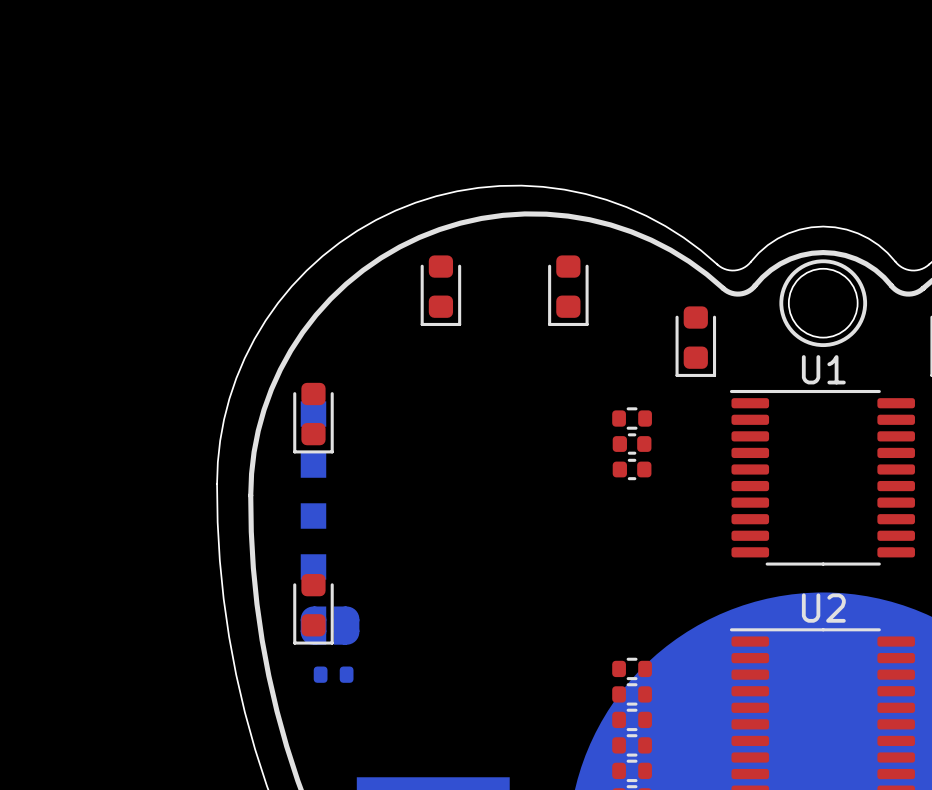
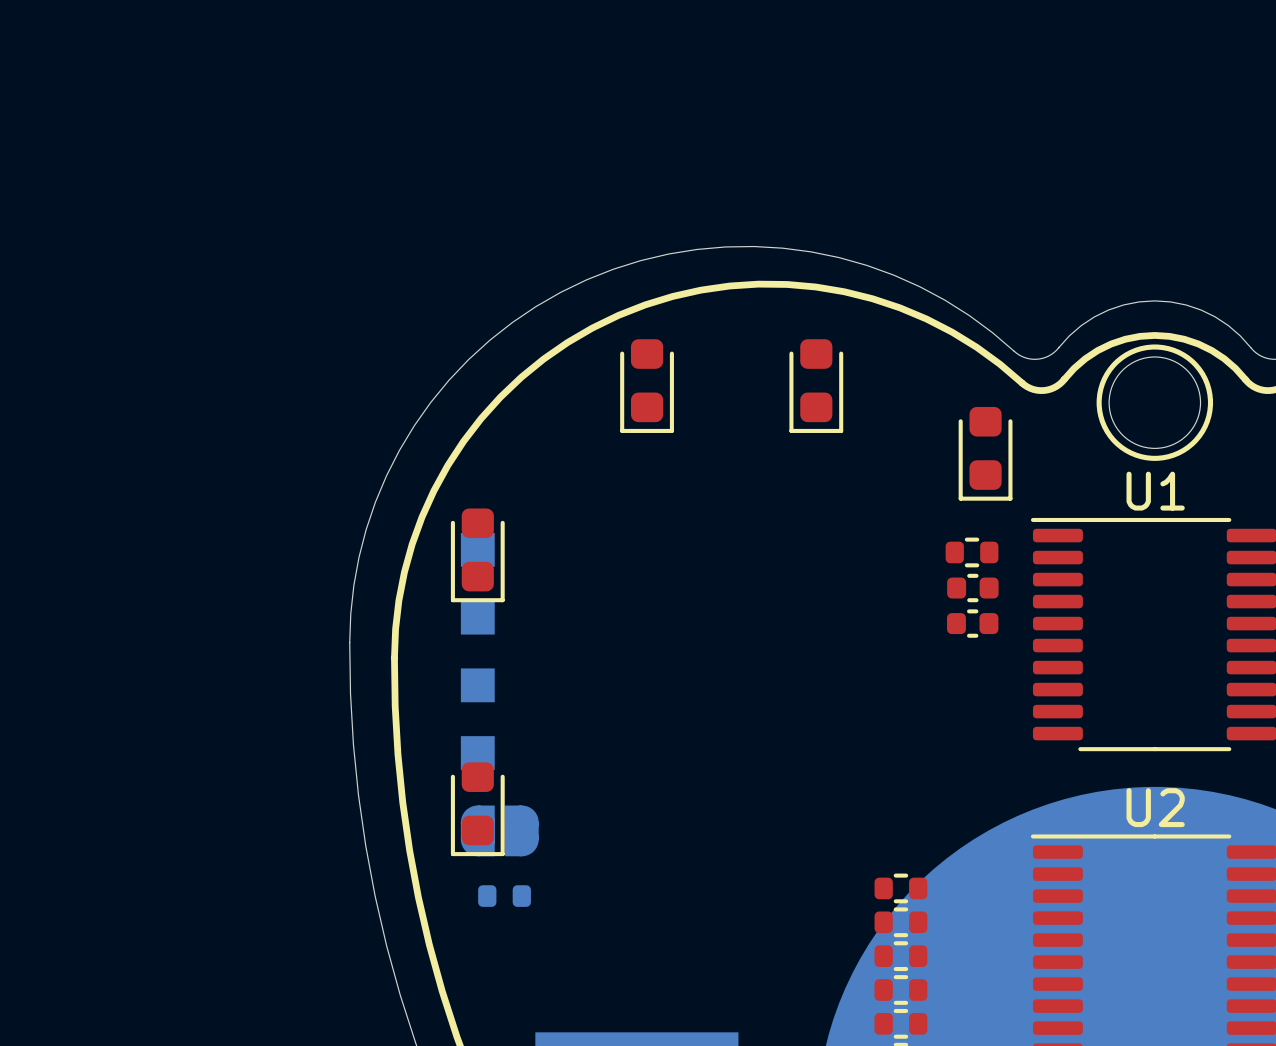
part position: (632, 418) -> (972, 552)
part: none -> (972, 588)
part: (632, 444) -> none
part: (632, 469) -> none
part: none -> (972, 623)

